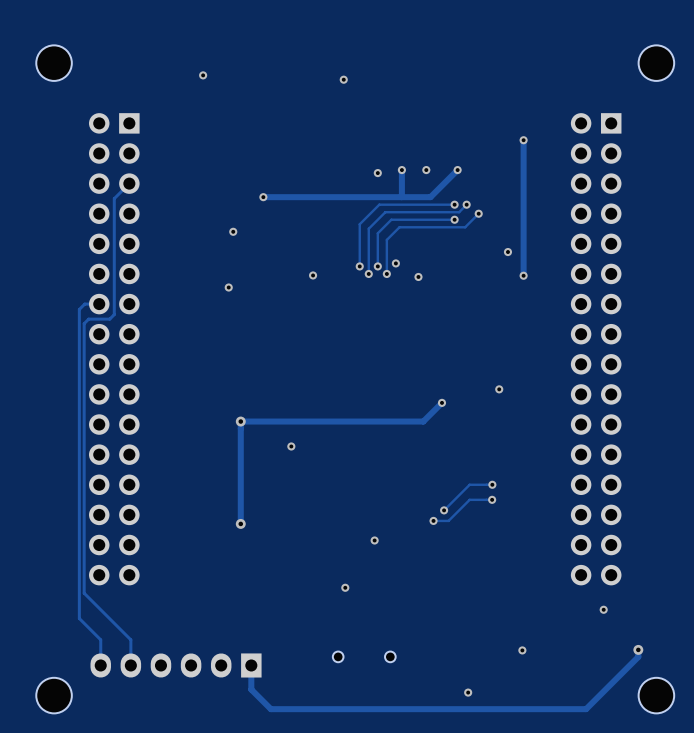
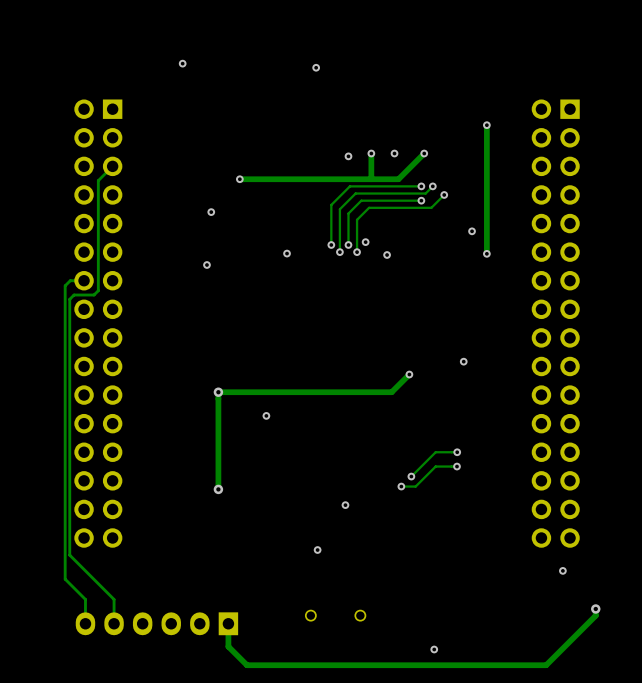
part: (54, 63) -> none
part: (656, 63) -> none
via: (522, 650) -> none
part: (54, 695) -> none
part: (656, 695) -> none

